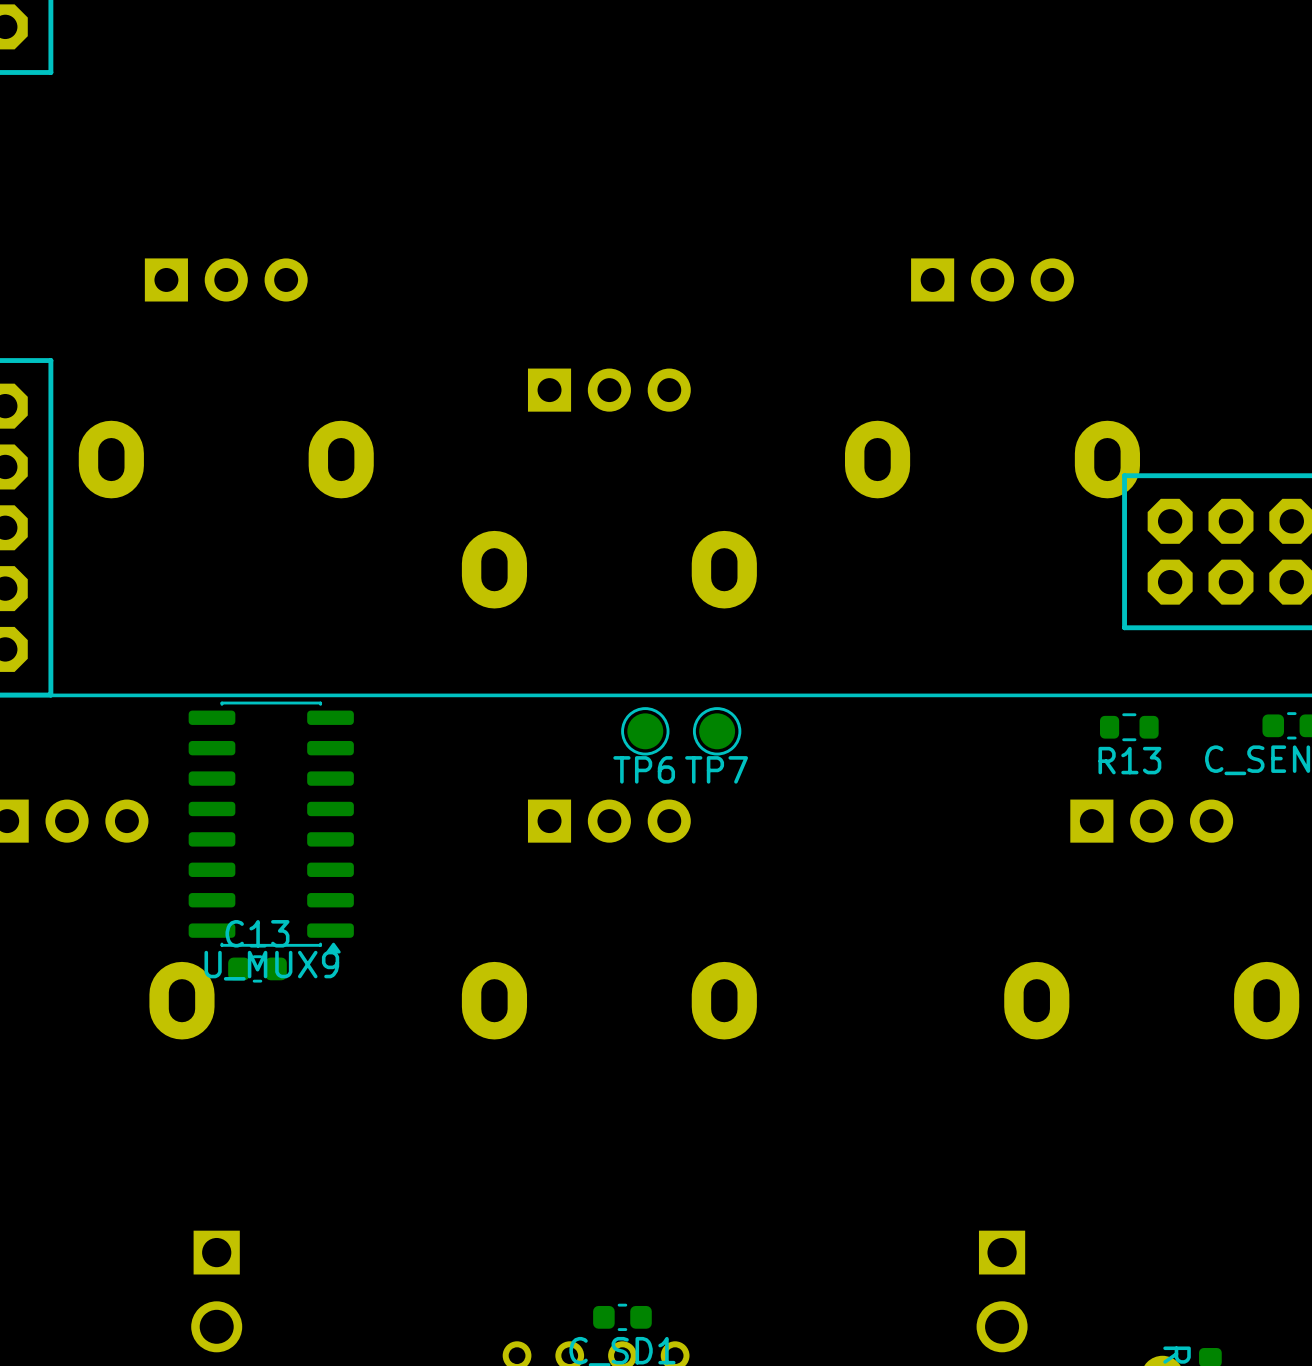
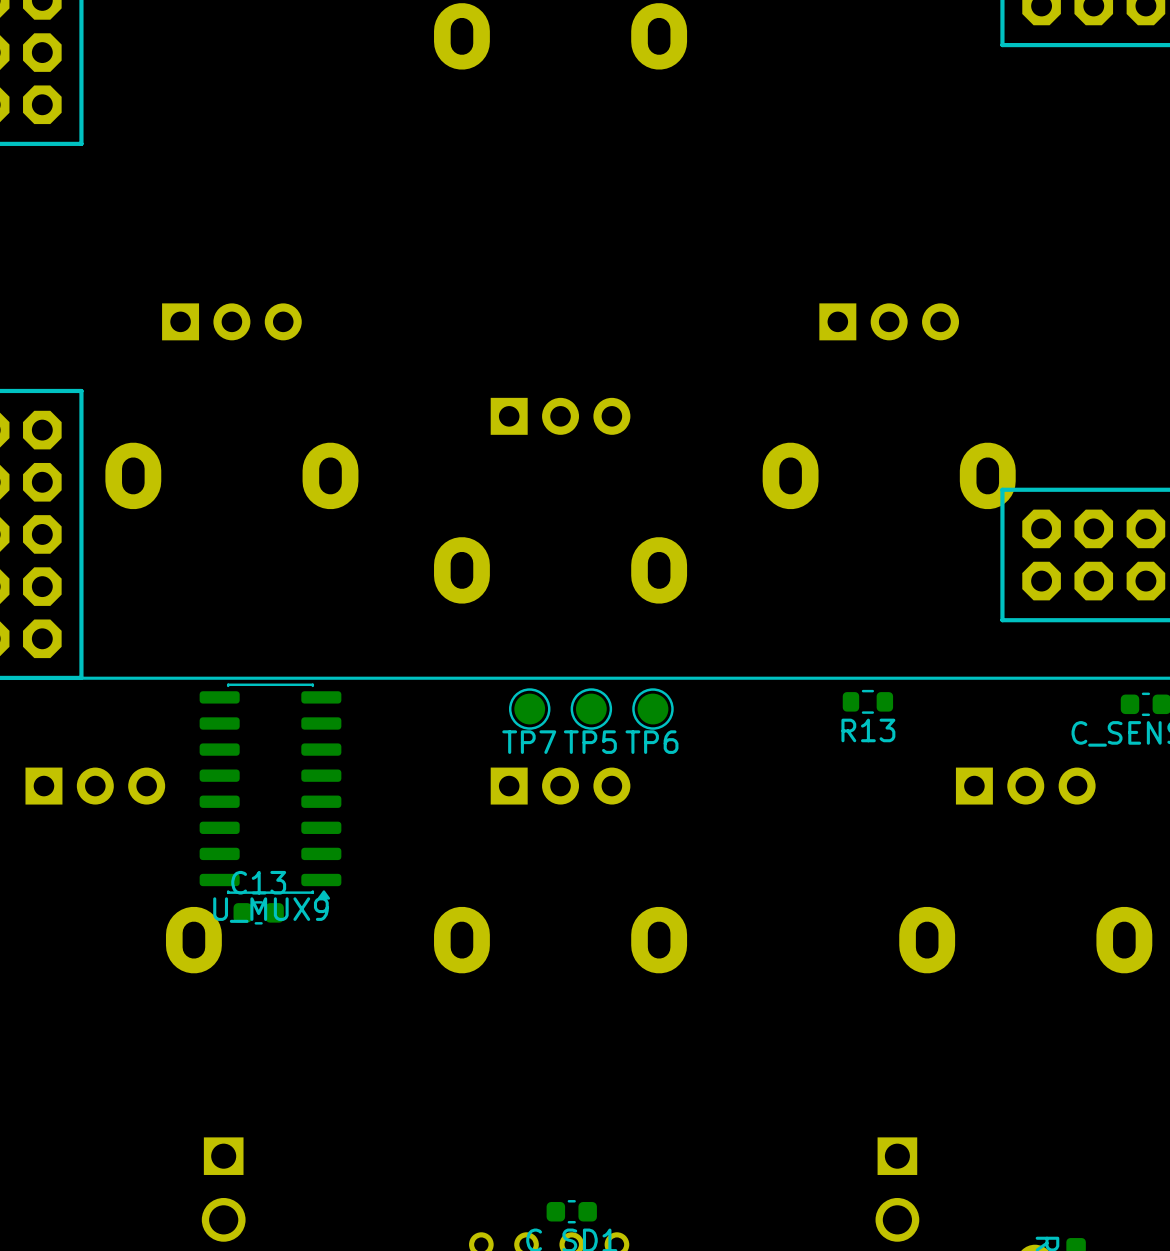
R13 position: (1129, 727) -> (867, 701)
TP7: none -> (529, 709)
TP6 name: TP6 (644, 769) -> TP5 (590, 742)
TP7 name: TP7 (716, 769) -> TP6 (651, 742)

